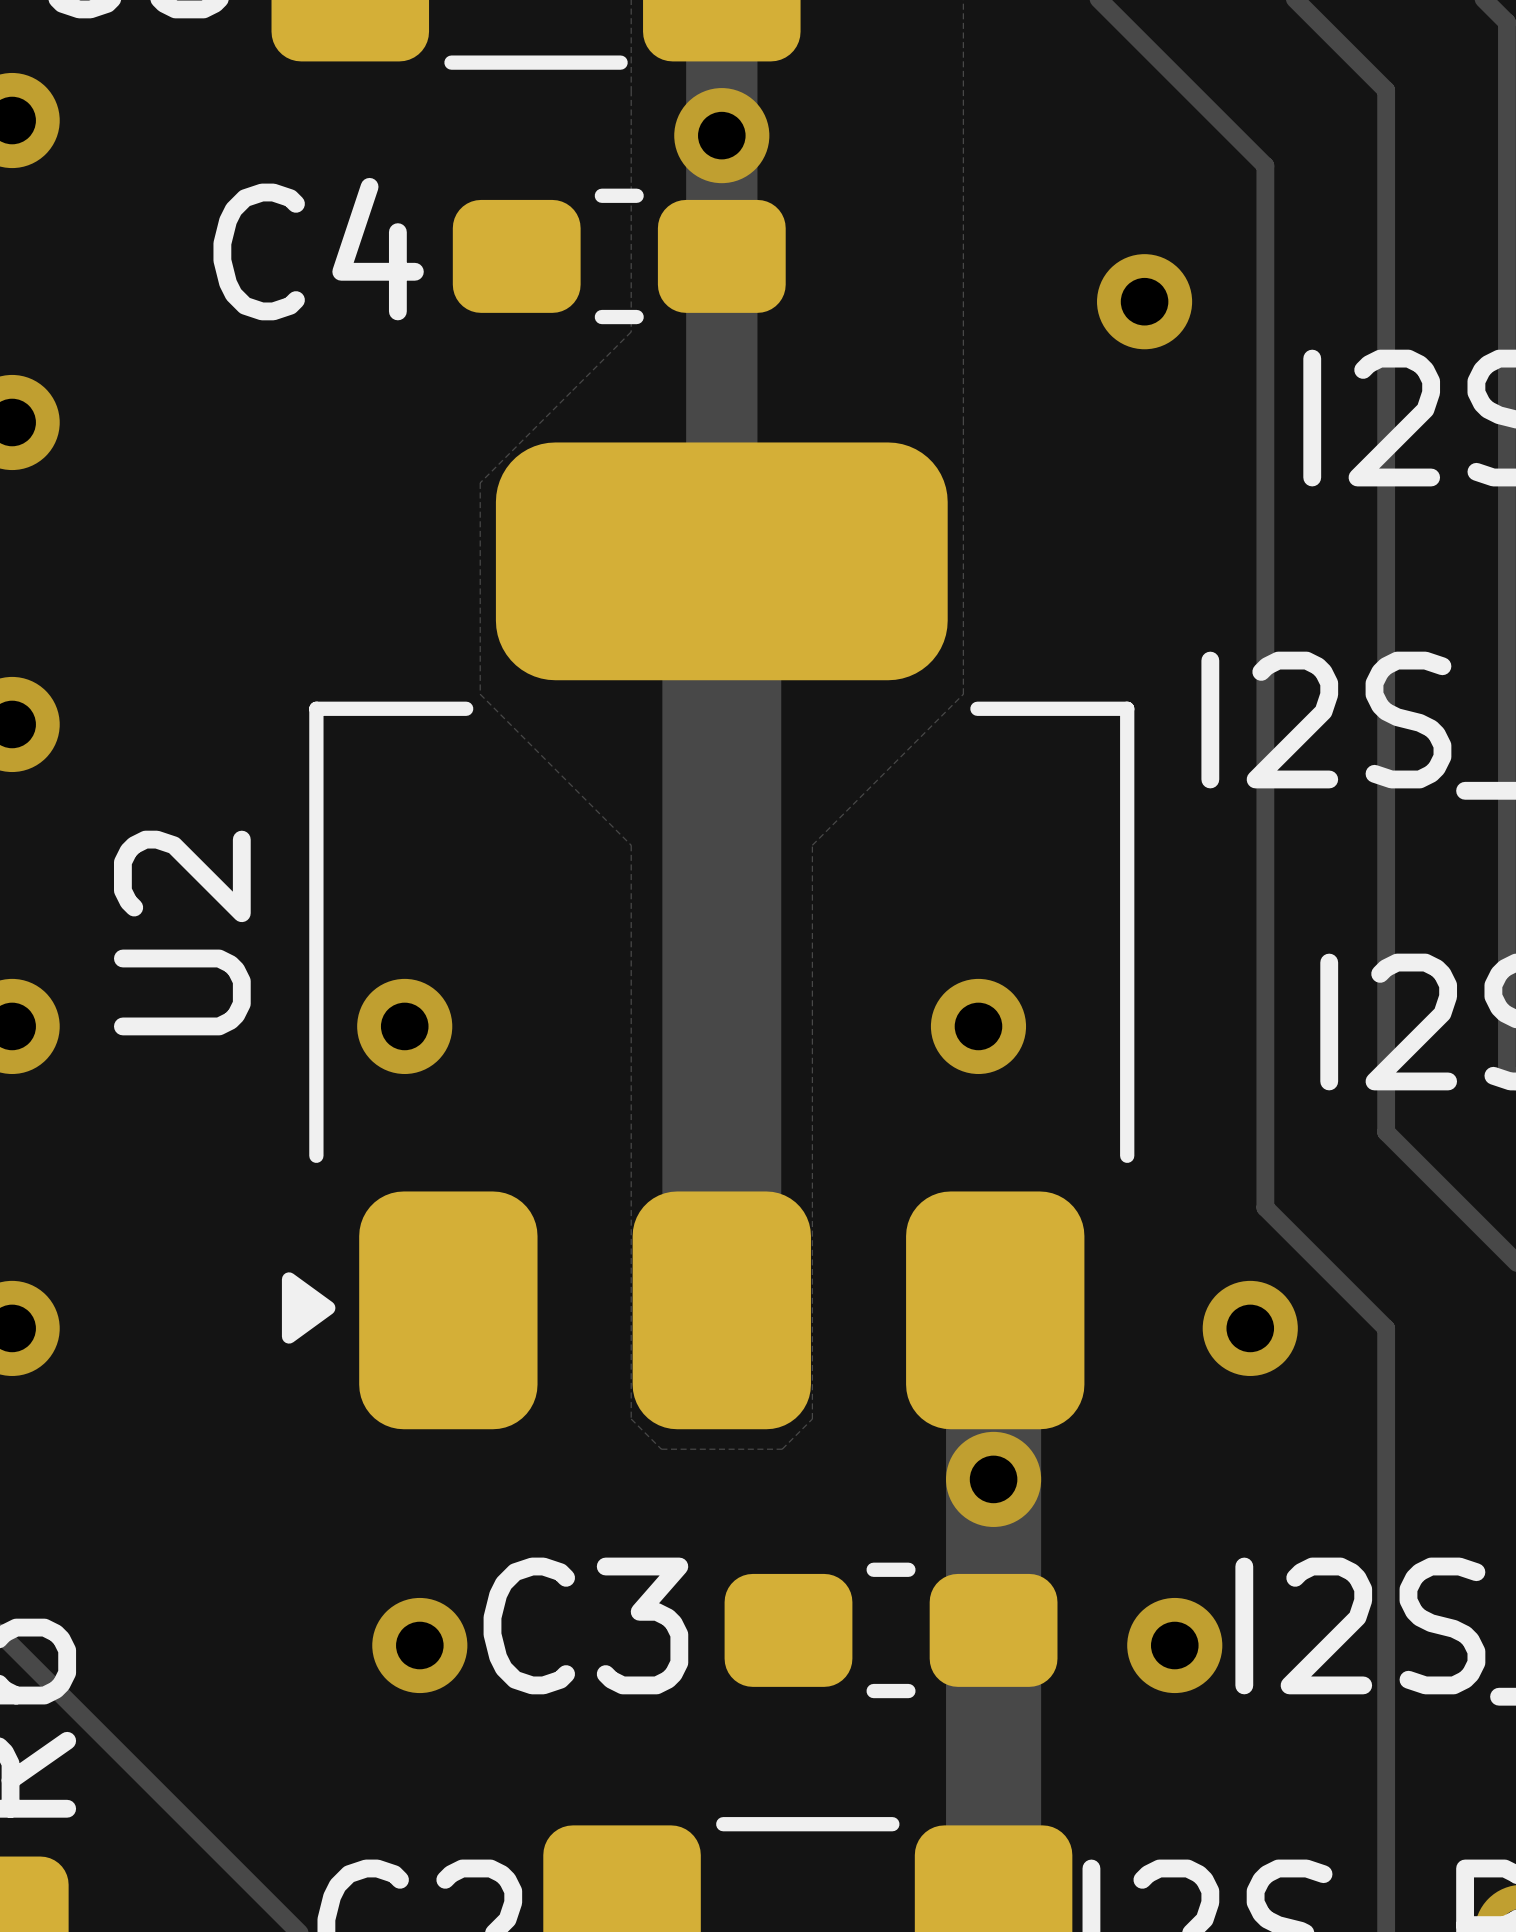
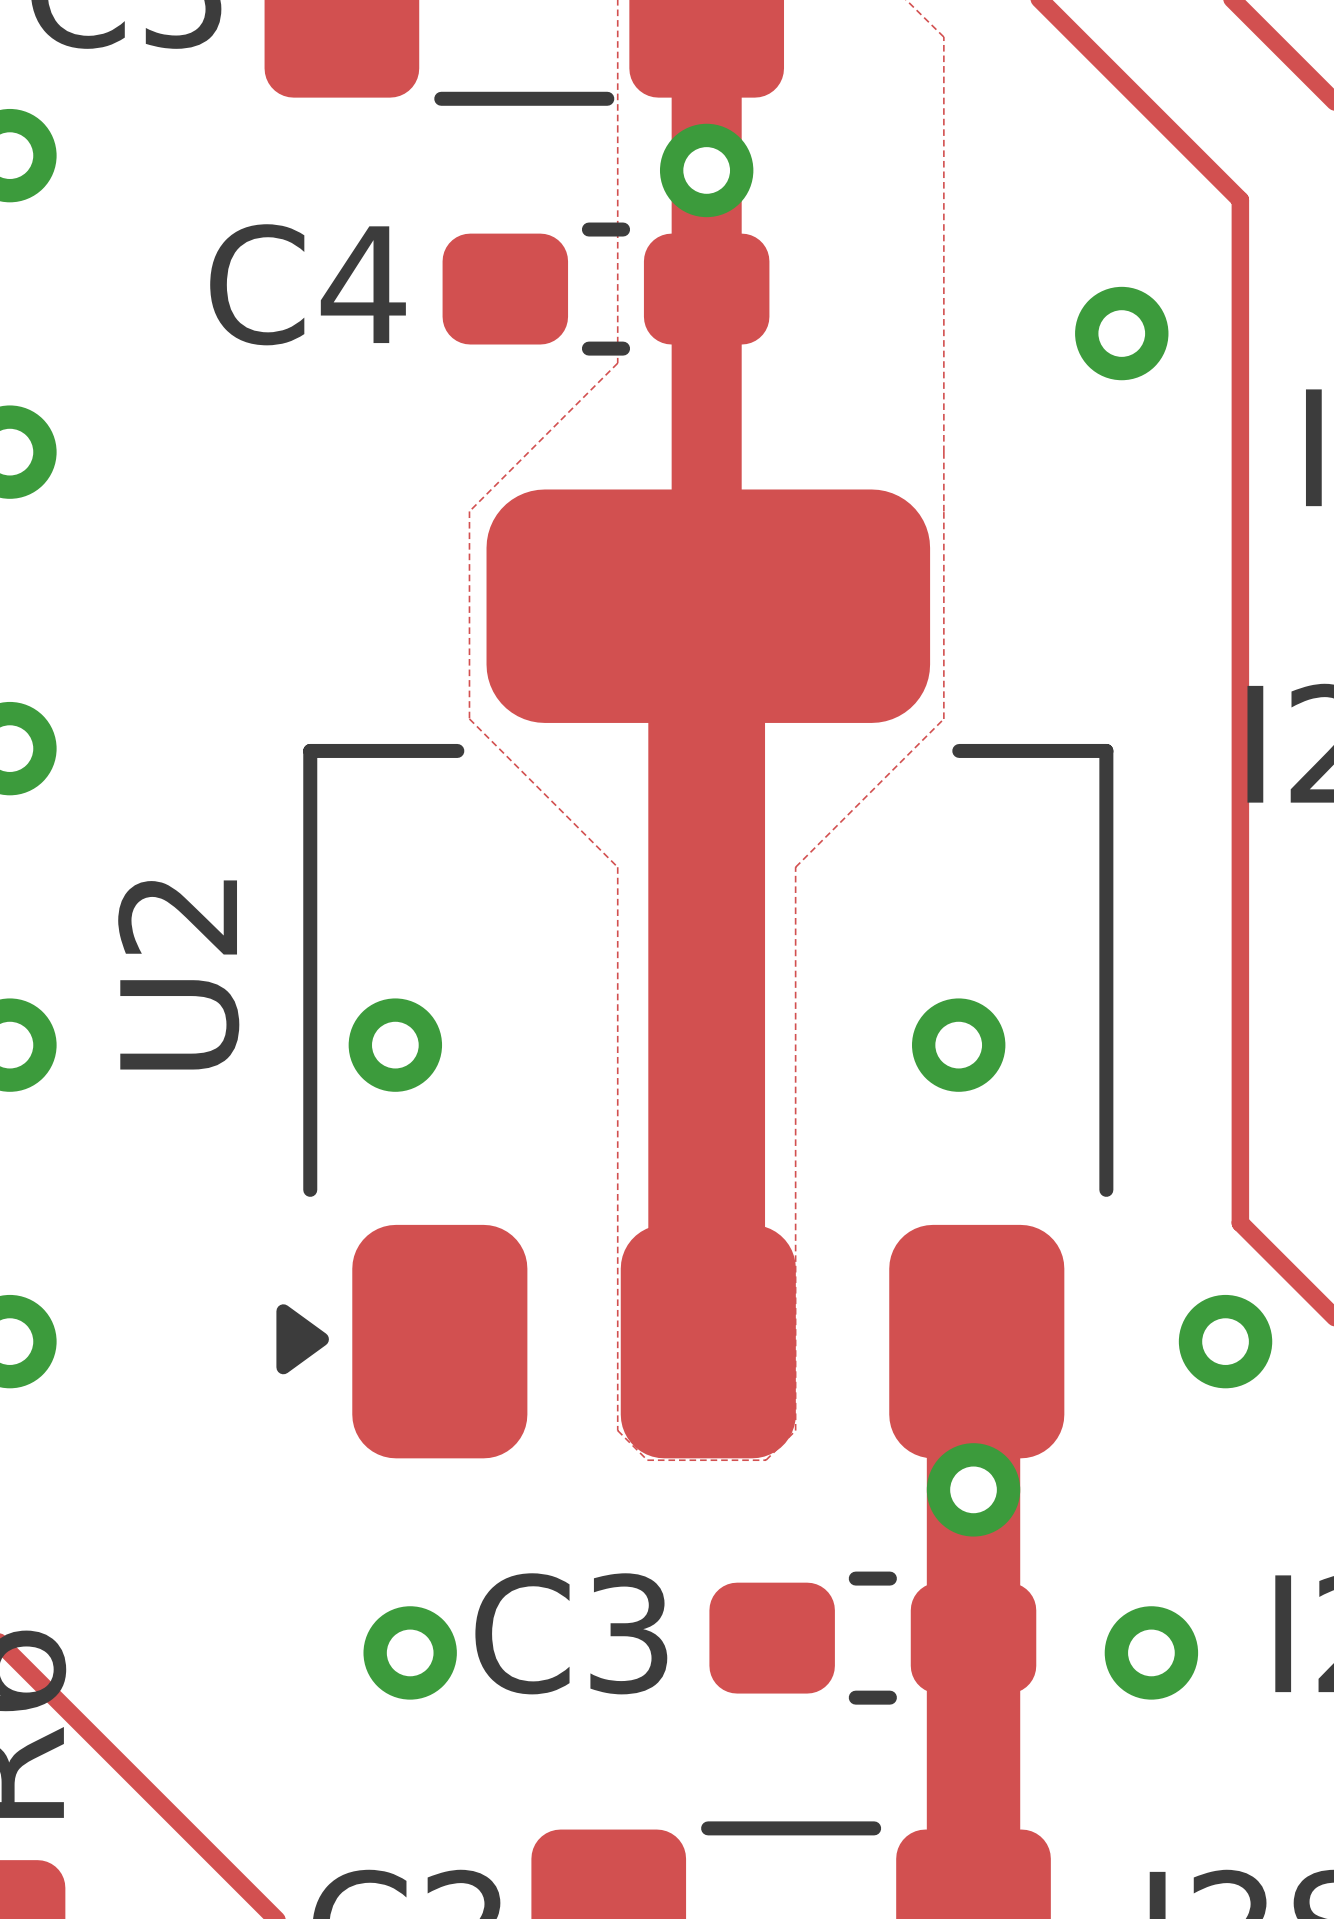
U2 position: (708, 935) -> (694, 973)

